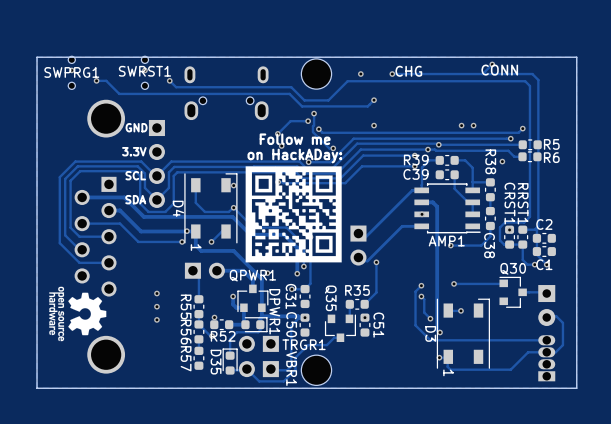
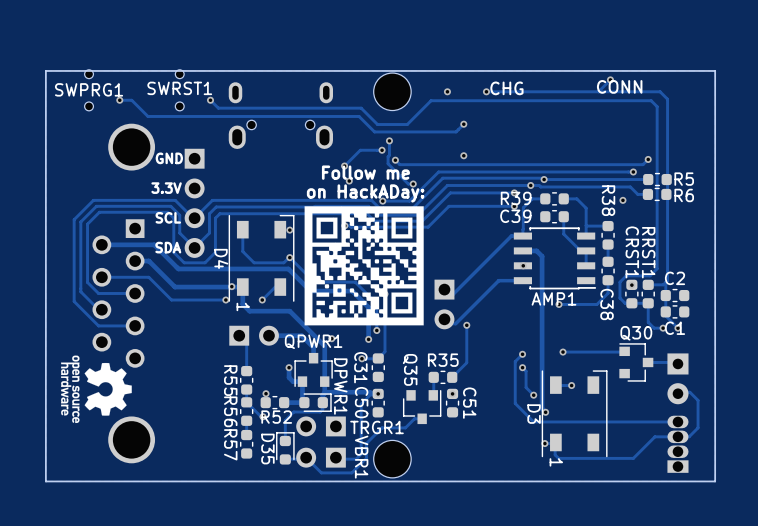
via: (71, 70) -> none
via: (144, 70) -> none
via: (461, 125) -> none
via: (473, 125) -> none
via: (156, 293) -> none
via: (156, 306) -> none
via: (156, 319) -> none

